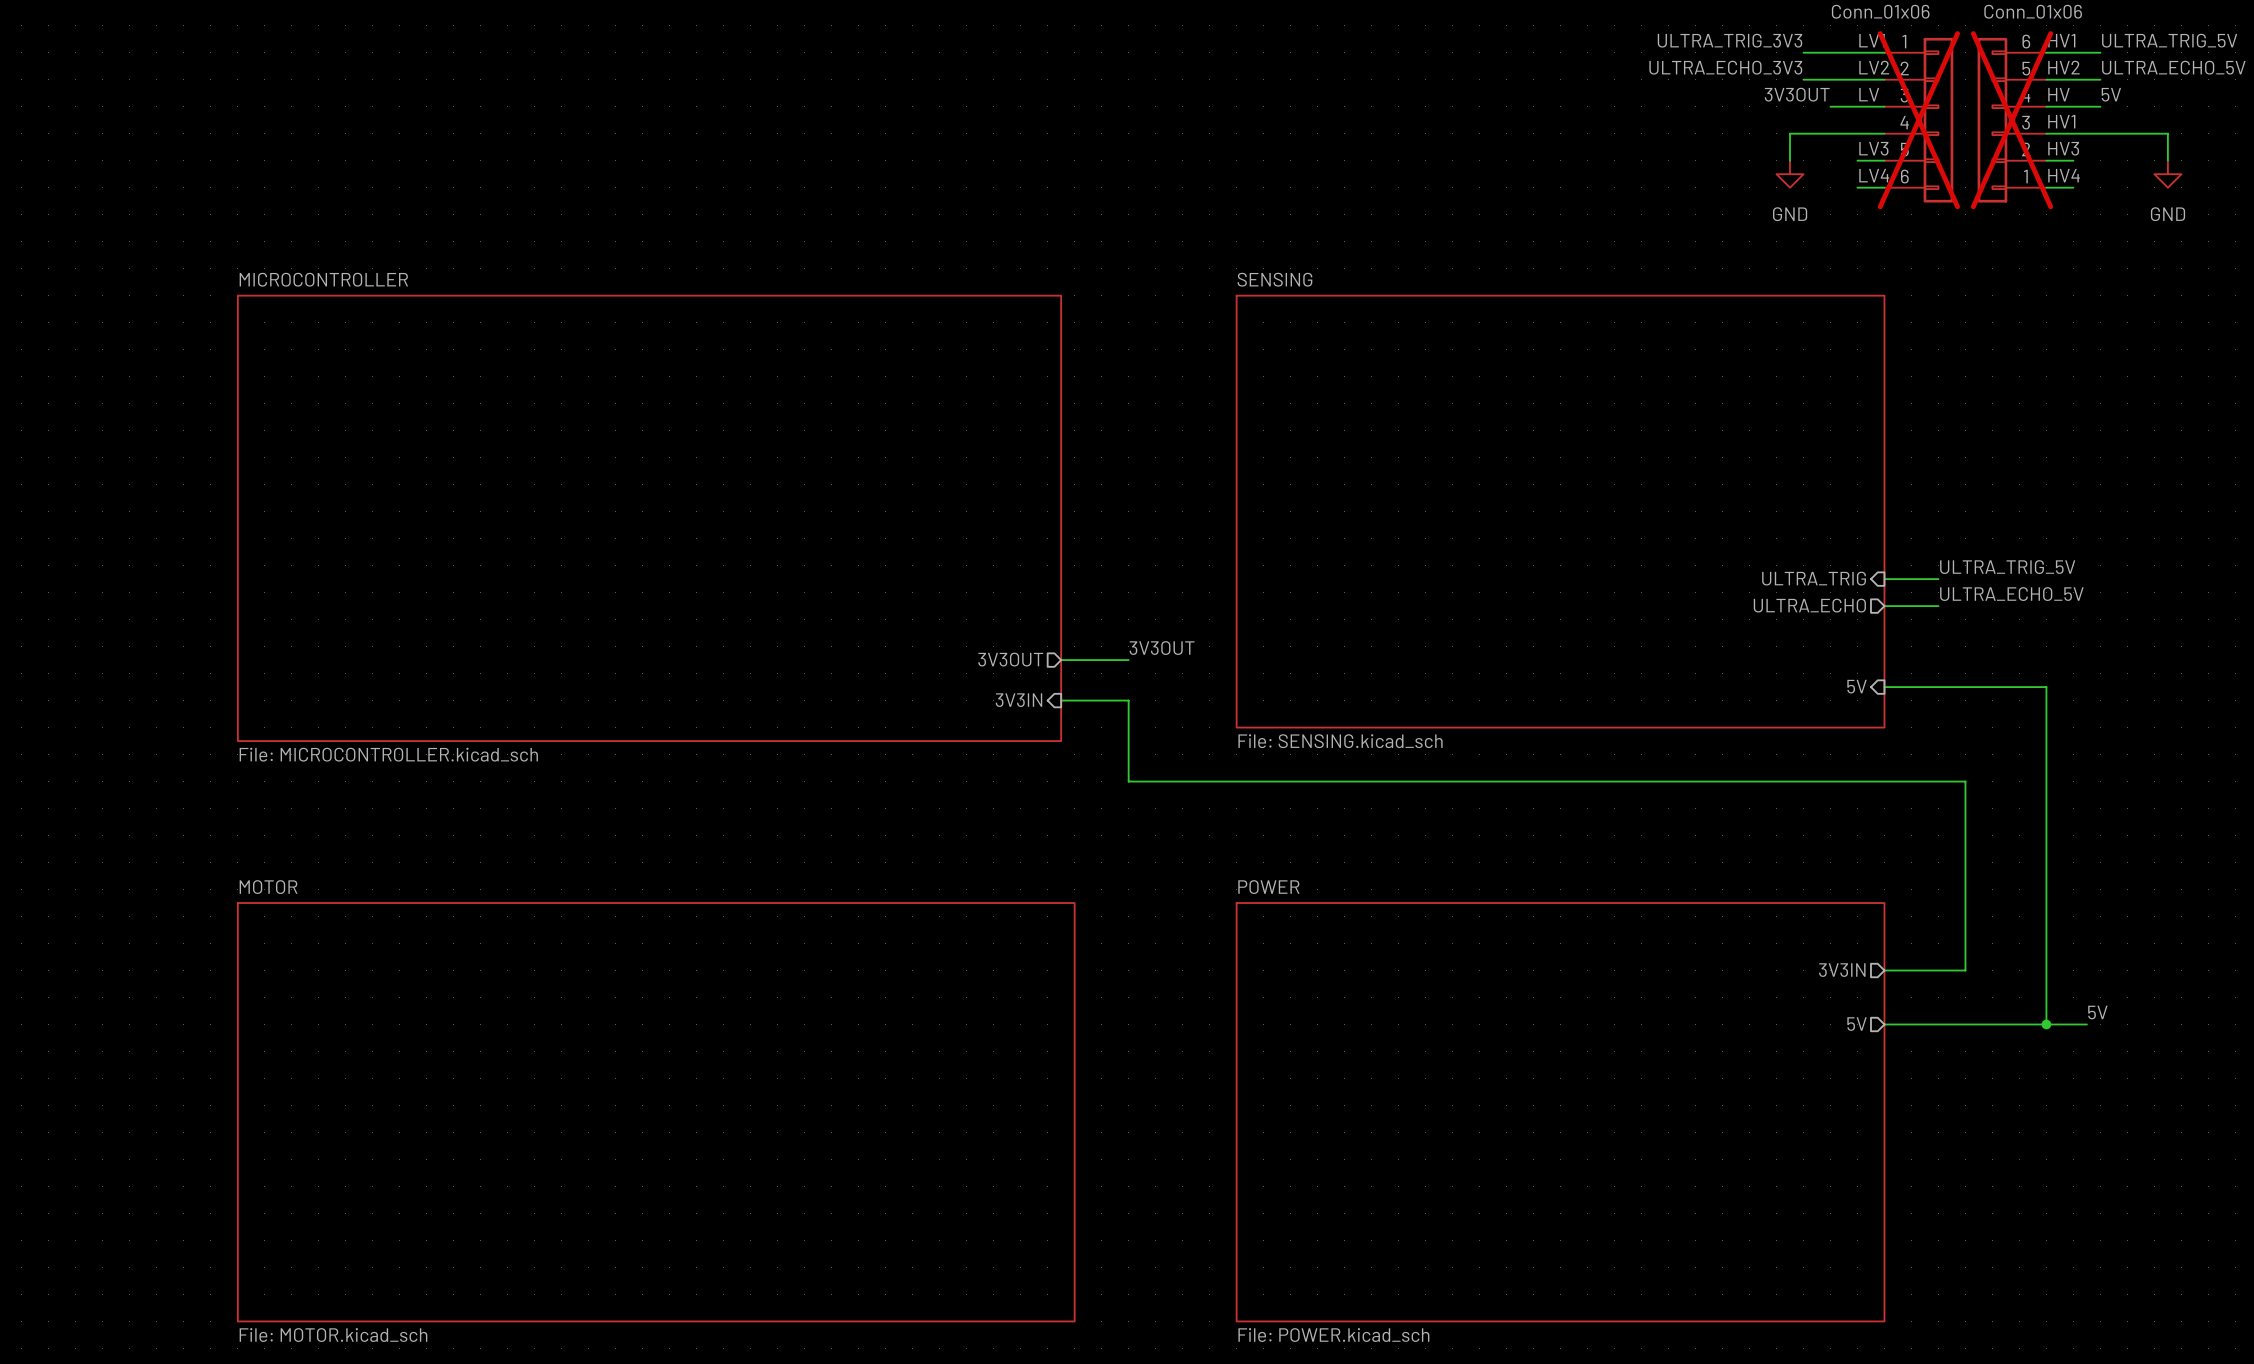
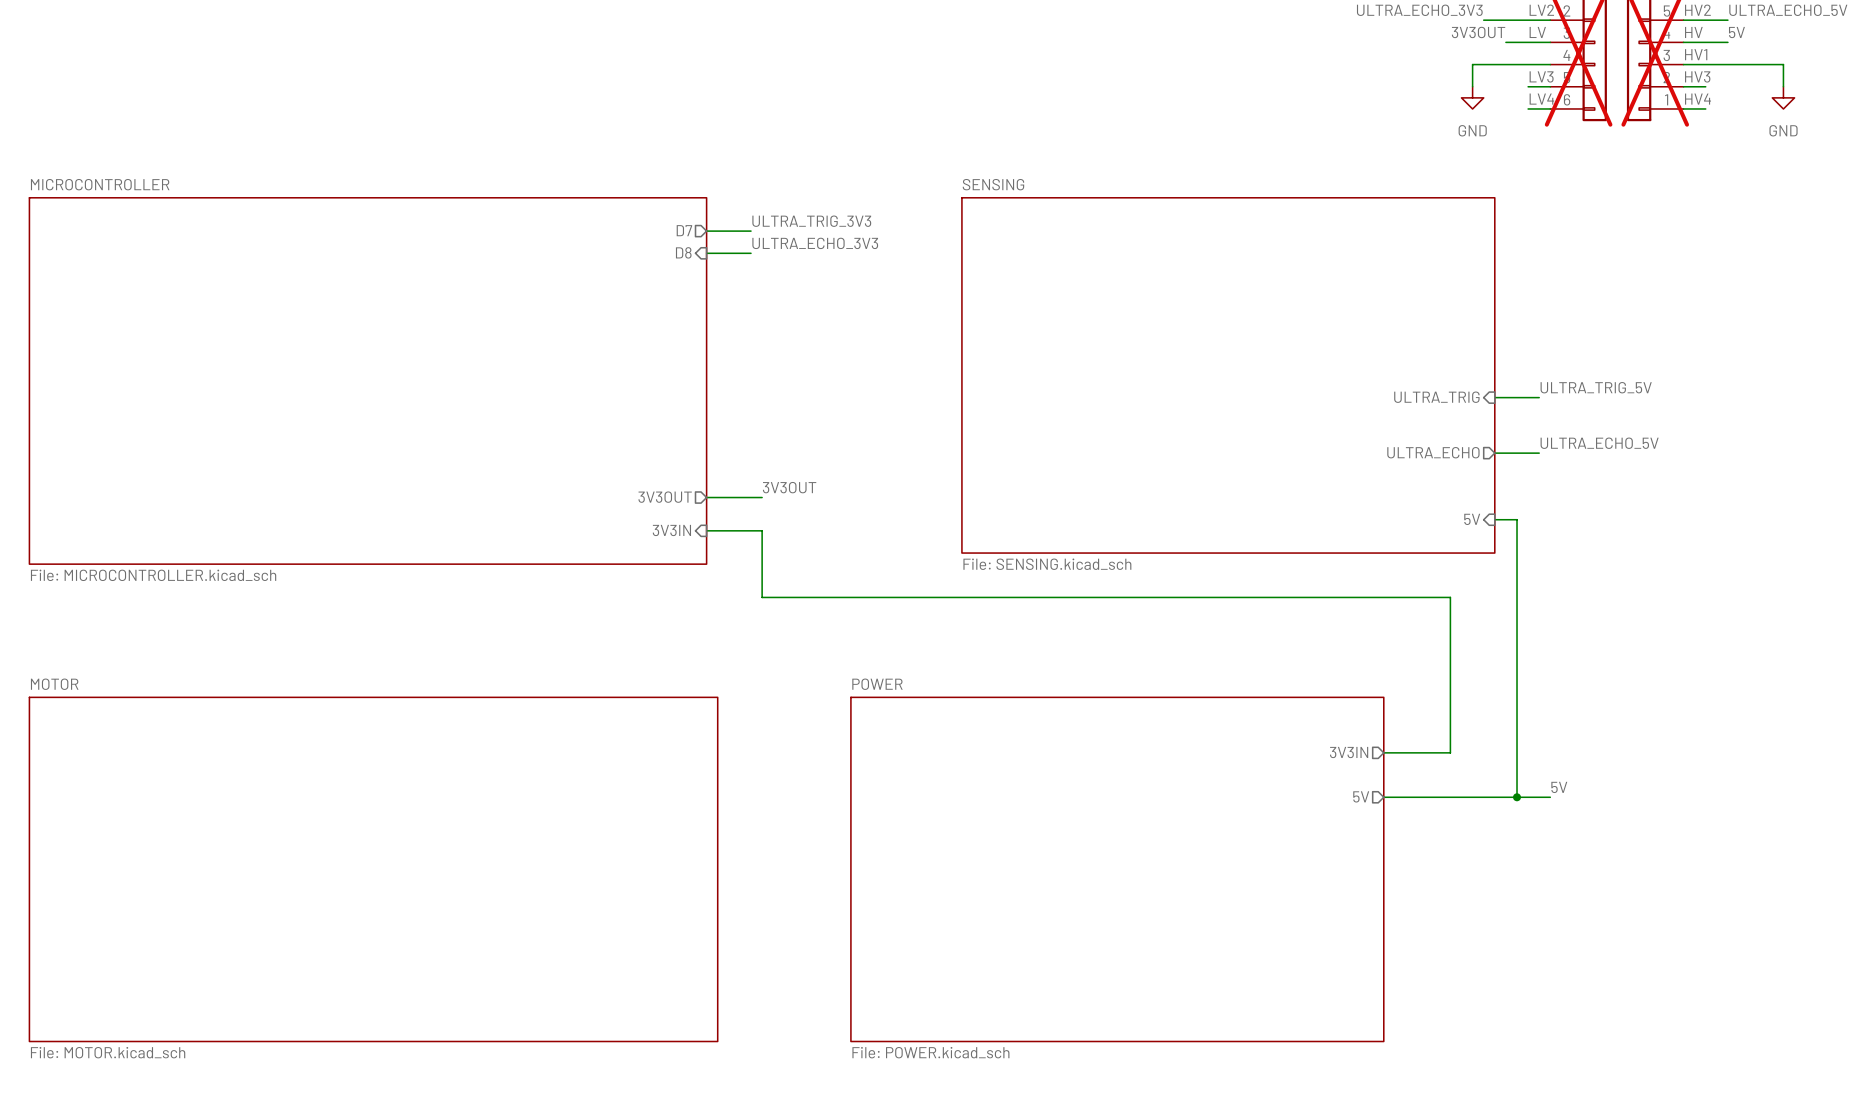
label: none -> ULTRA_TRIG_3V3 (811, 221)
sheet pin: none -> D7 (684, 230)
wire: none -> (706, 231) (751, 231)
label: none -> ULTRA_ECHO_3V3 (815, 243)
sheet pin: none -> D8 (683, 252)
wire: none -> (706, 253) (751, 253)
sheet SENSING position: (1560, 511) -> (1228, 375)
sheet MICROCONTROLLER position: (649, 518) -> (368, 380)
label position: ULTRA_TRIG_5V (2007, 567) -> ULTRA_TRIG_5V (1596, 387)
sheet pin position: ULTRA_TRIG (1814, 578) -> ULTRA_TRIG (1436, 397)
wire: (1884, 579) (1938, 579) -> (1494, 397) (1539, 397)
label position: ULTRA_ECHO_5V (2011, 594) -> ULTRA_ECHO_5V (1599, 443)
sheet pin position: ULTRA_ECHO (1809, 605) -> ULTRA_ECHO (1433, 452)
wire: (1884, 606) (1938, 606) -> (1494, 453) (1539, 453)
label position: 3V3OUT (1162, 648) -> 3V3OUT (789, 487)
sheet pin position: 3V3OUT (1010, 659) -> 3V3OUT (665, 497)
wire: (1061, 660) (1128, 660) -> (706, 497) (762, 497)
sheet pin position: 5V (1857, 686) -> 5V (1472, 519)
wire: none -> (1494, 519) (1517, 519) (1517, 797)
wire: (1884, 687) (2046, 687) (2046, 1024) -> none
sheet pin position: 3V3IN (1018, 700) -> 3V3IN (671, 530)
wire: (1061, 700) (1128, 700) (1128, 781) -> (706, 530) (762, 530) (762, 597) (928, 597)
wire: (1763, 781) (1965, 781) (1965, 970) (1884, 970) -> (1450, 597) (1450, 752) (1383, 752)
sheet pin position: 3V3IN (1842, 970) -> 3V3IN (1349, 752)
label position: 5V (2097, 1012) -> 5V (1559, 787)
sheet pin: none -> 5V (1361, 796)
junction: none -> (1517, 797)
sheet pin: 5V (1857, 1024) -> none
wire: (1884, 1024) (2086, 1024) -> (1550, 797) (1383, 797)
junction: (2046, 1024) -> none
sheet MOTOR position: (656, 1112) -> (373, 869)
sheet POWER position: (1560, 1112) -> (1117, 869)

